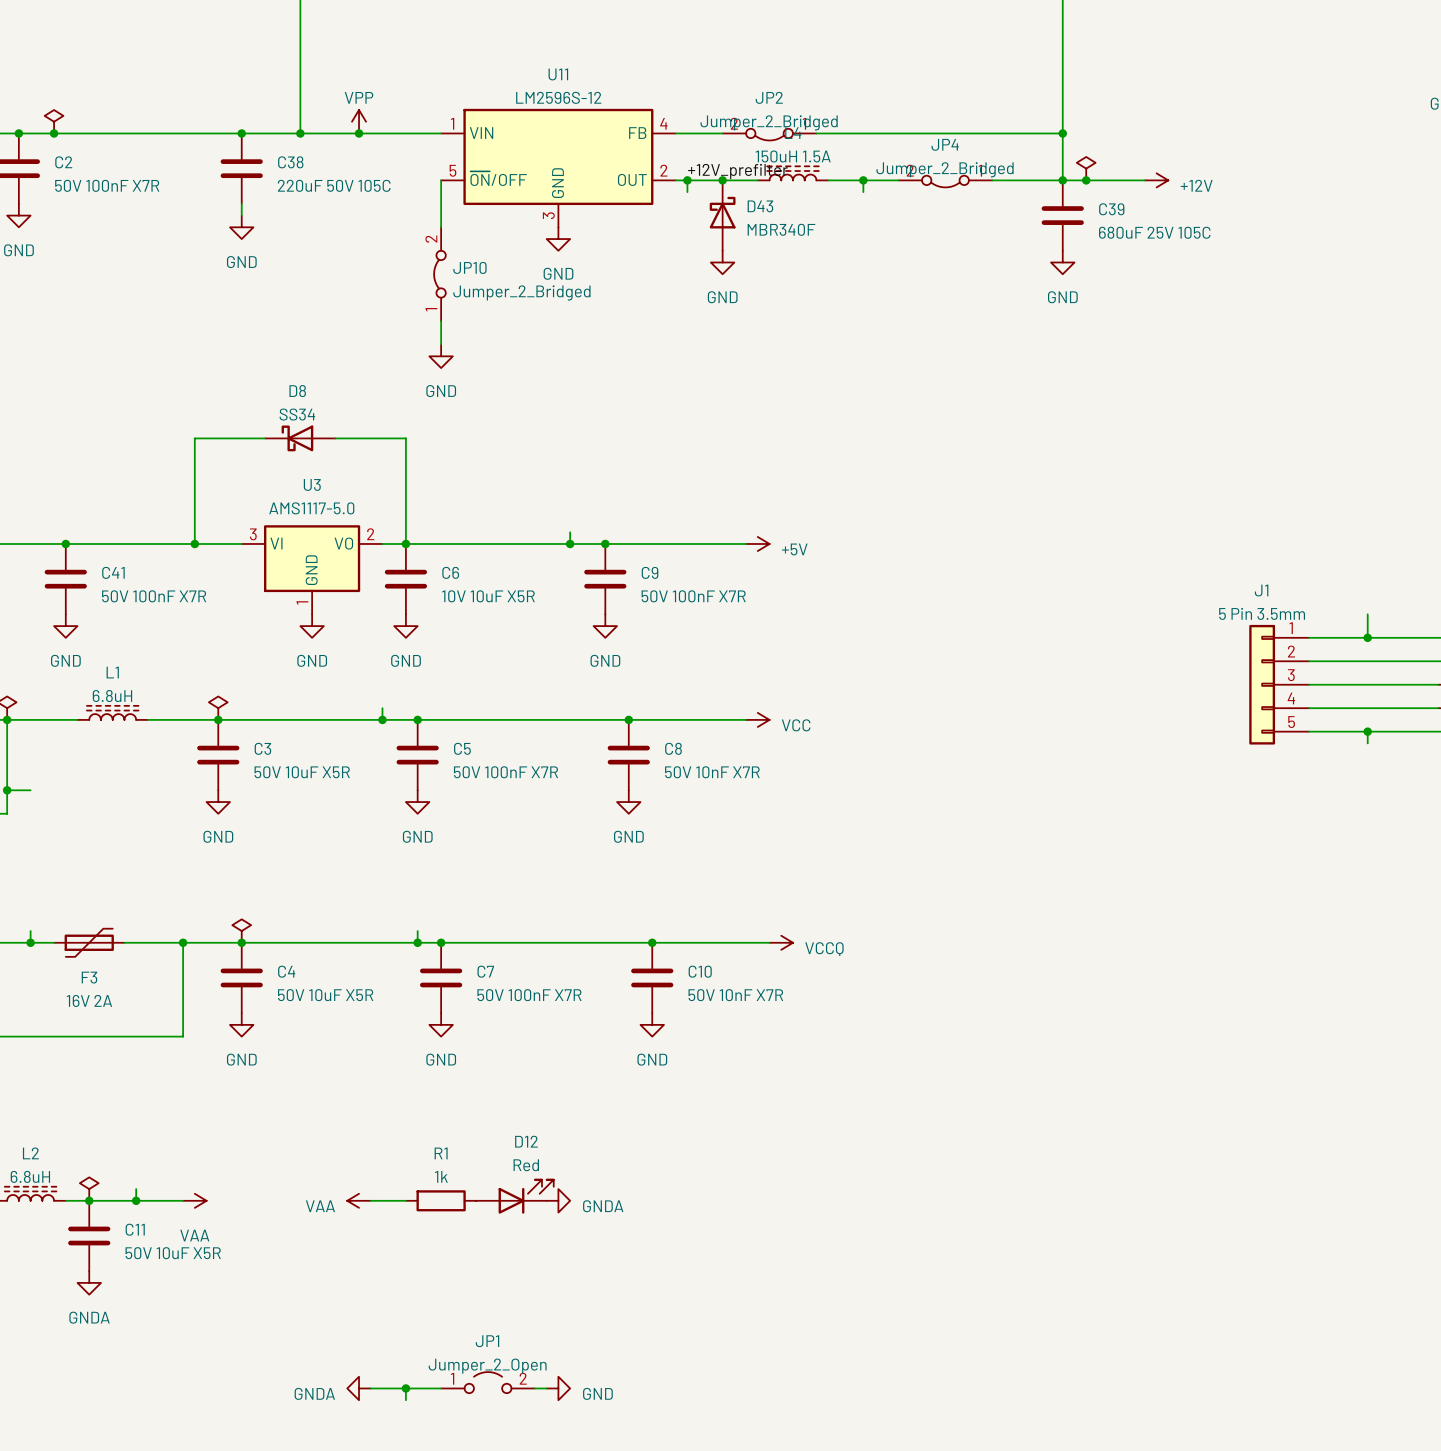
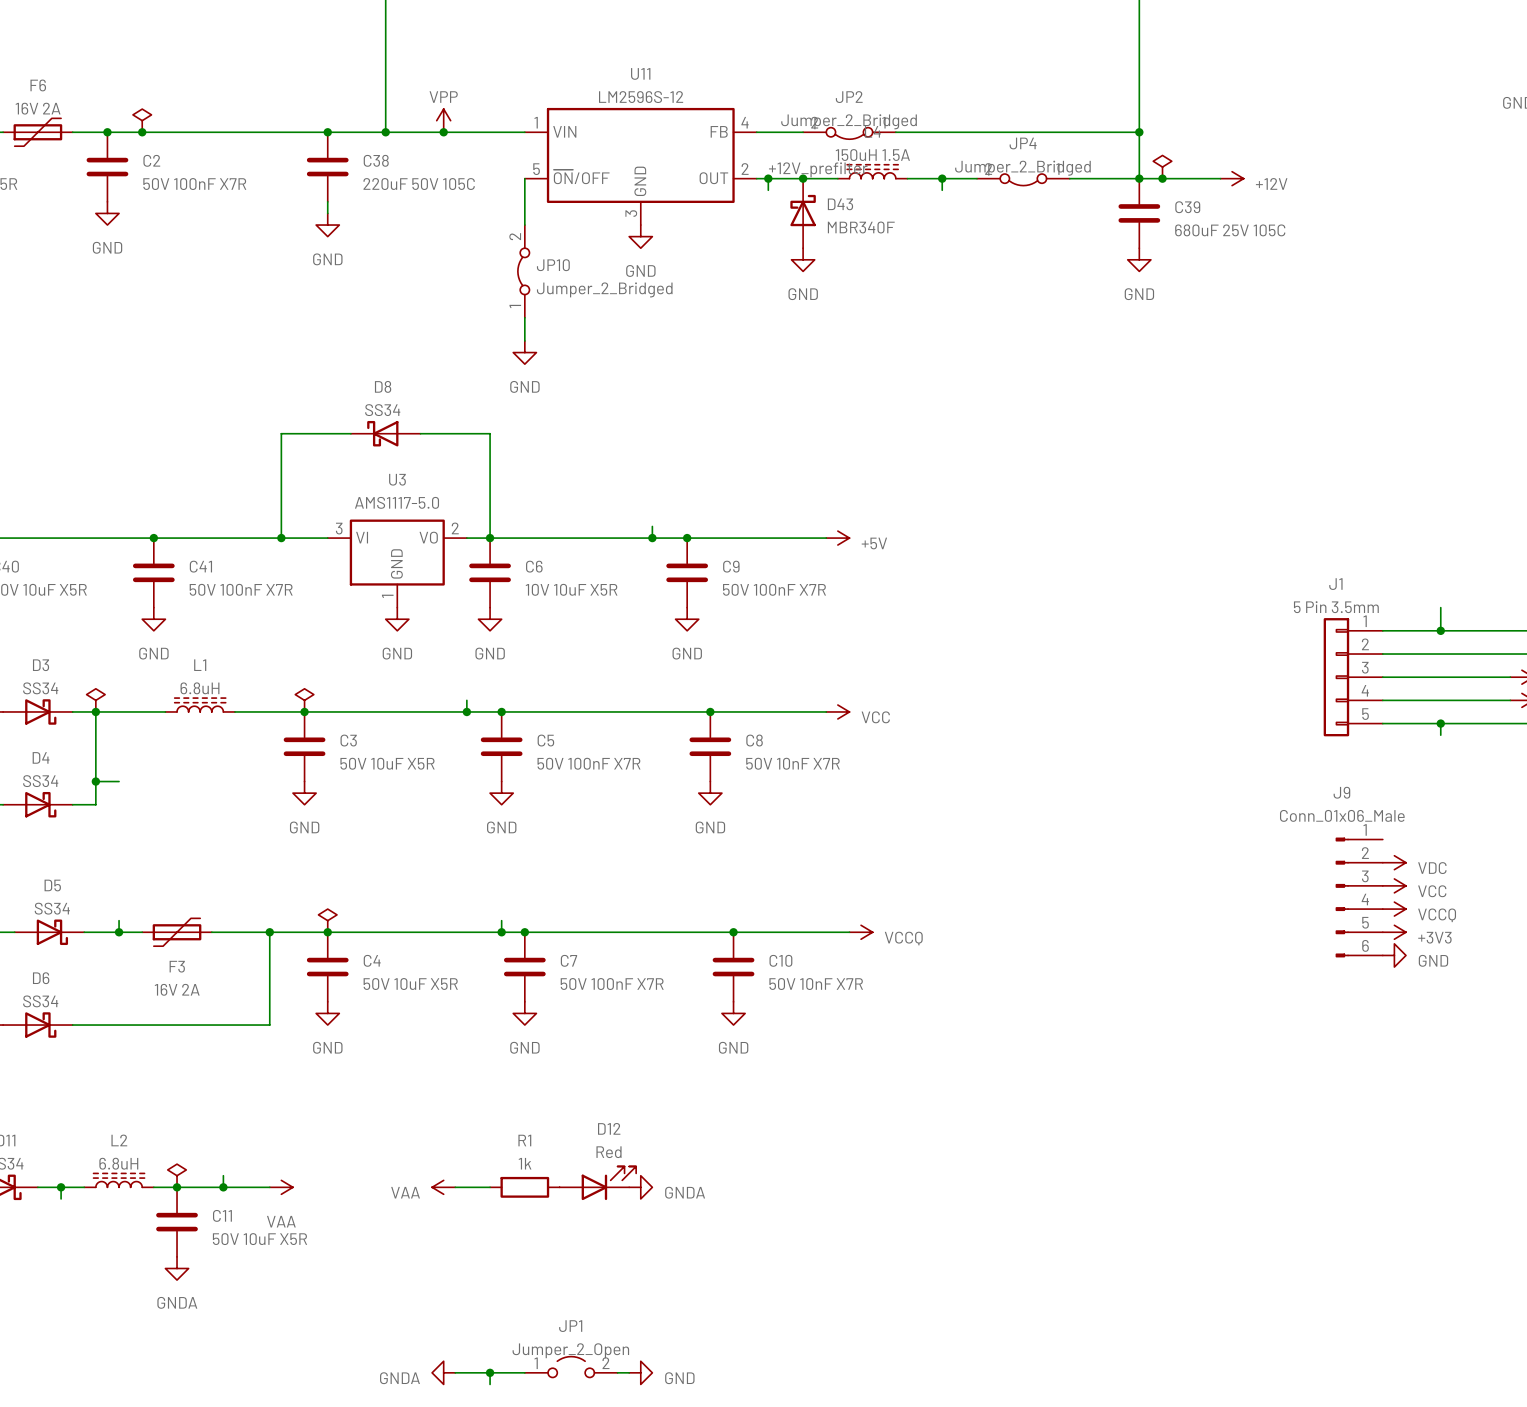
power symbol: none -> VDC (1394, 862)
power symbol: none -> VCC (1394, 885)
J9: none -> Conn_01x06_Male (1359, 897)
power symbol: none -> VCCQ (1394, 909)
power symbol: none -> +3V3 (1394, 932)
power symbol: none -> GND (1394, 955)

